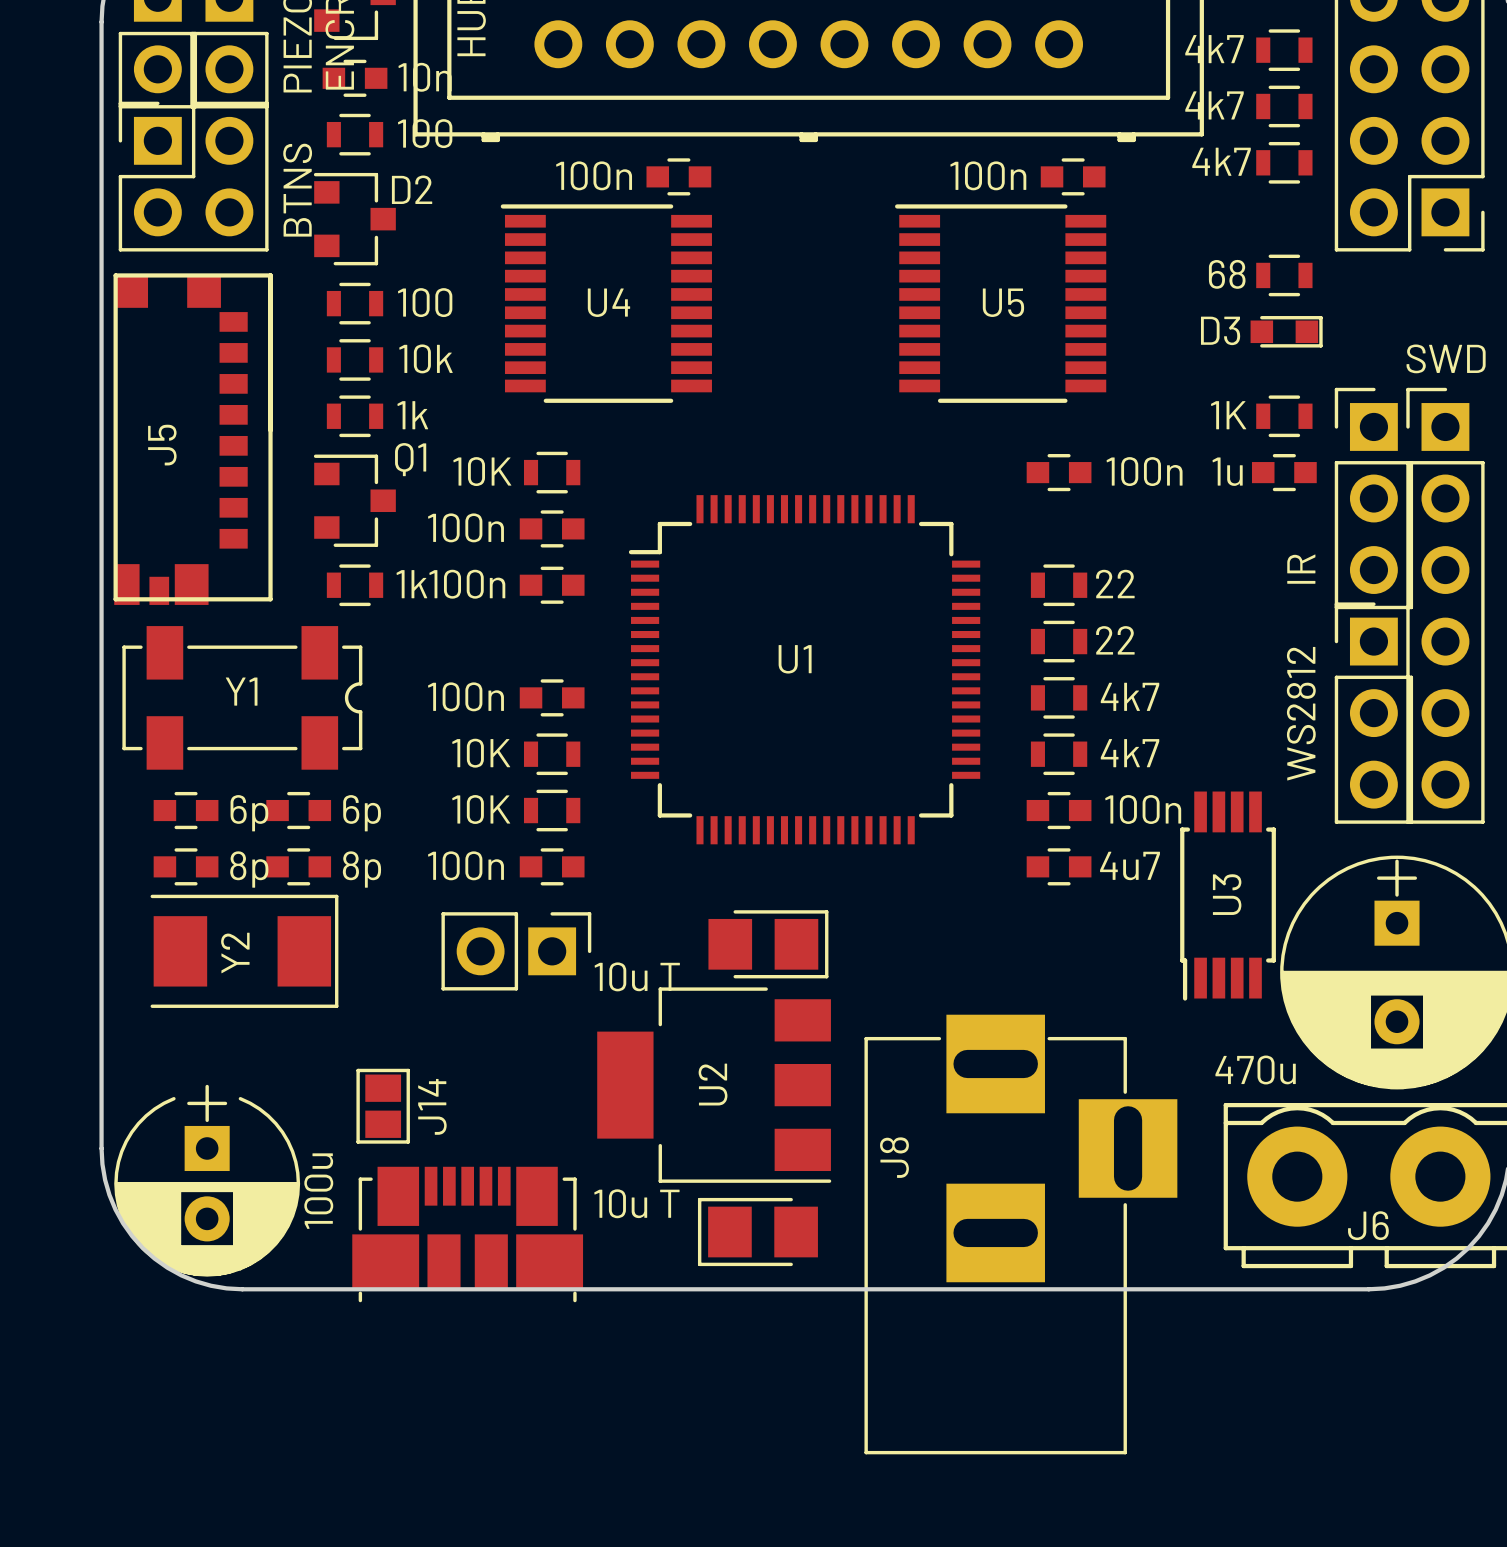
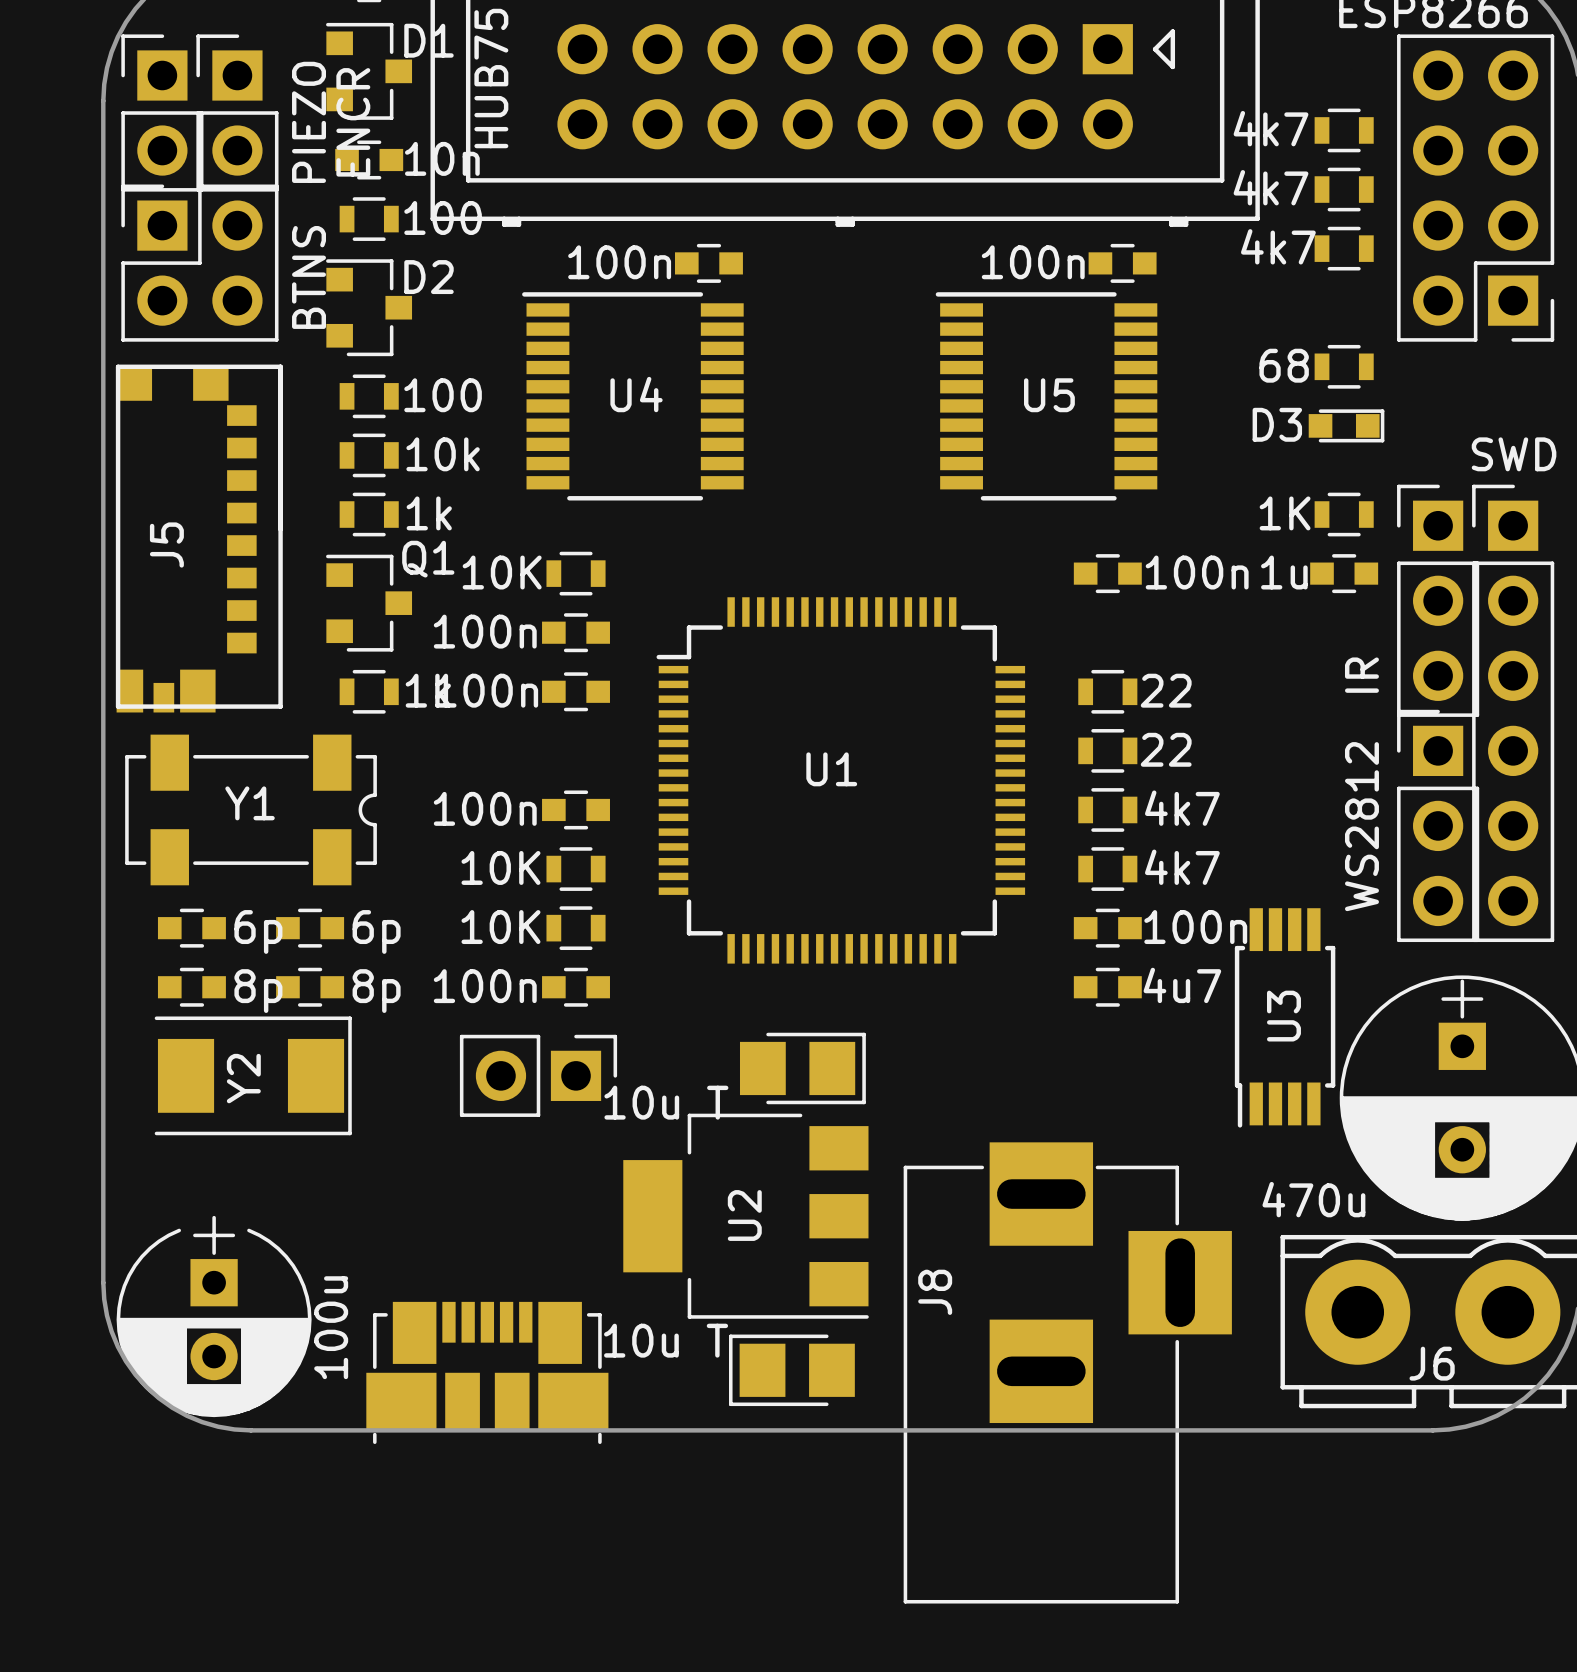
J14: (383, 1106) -> none

